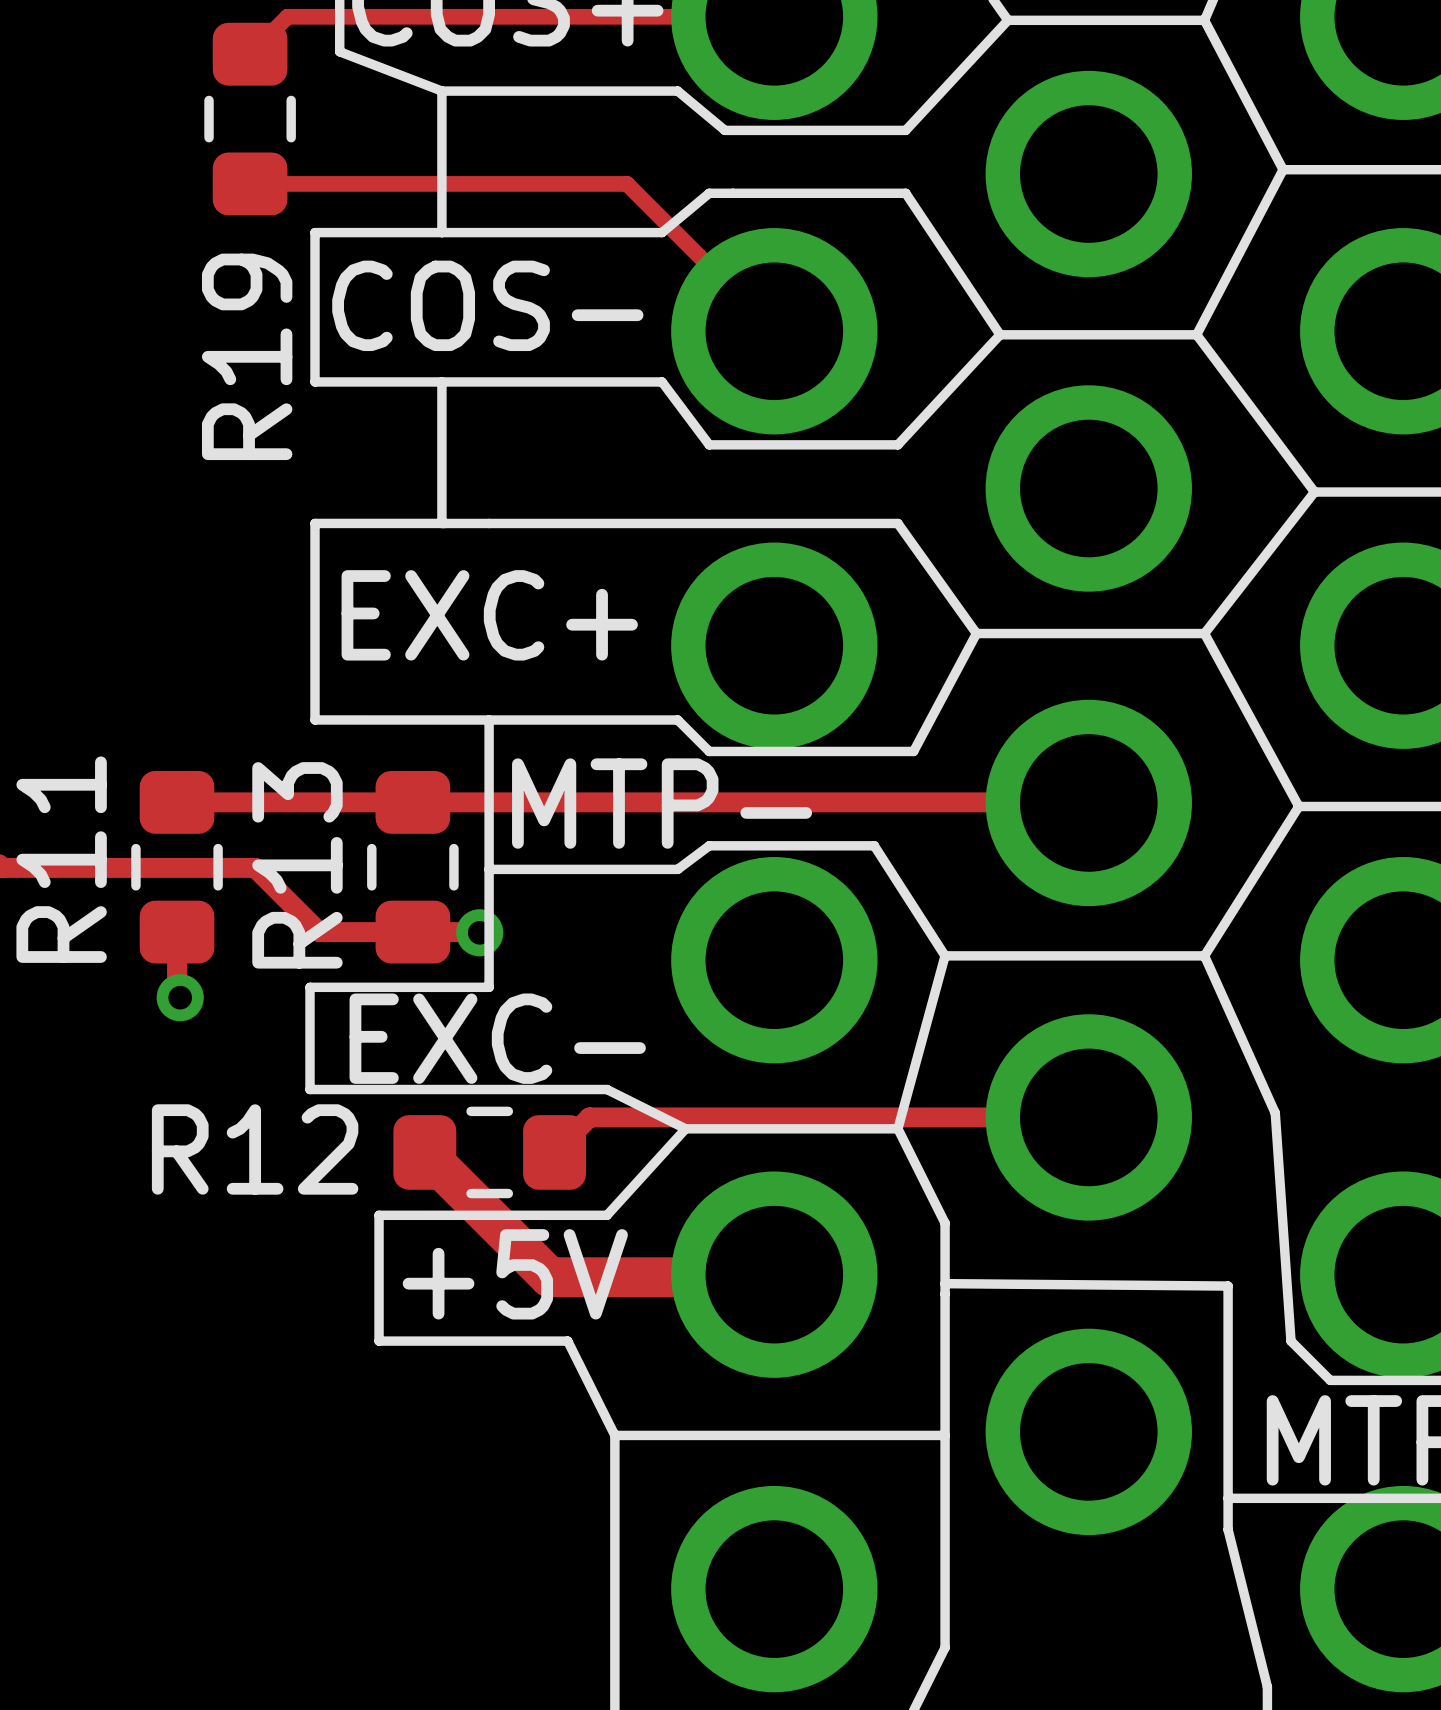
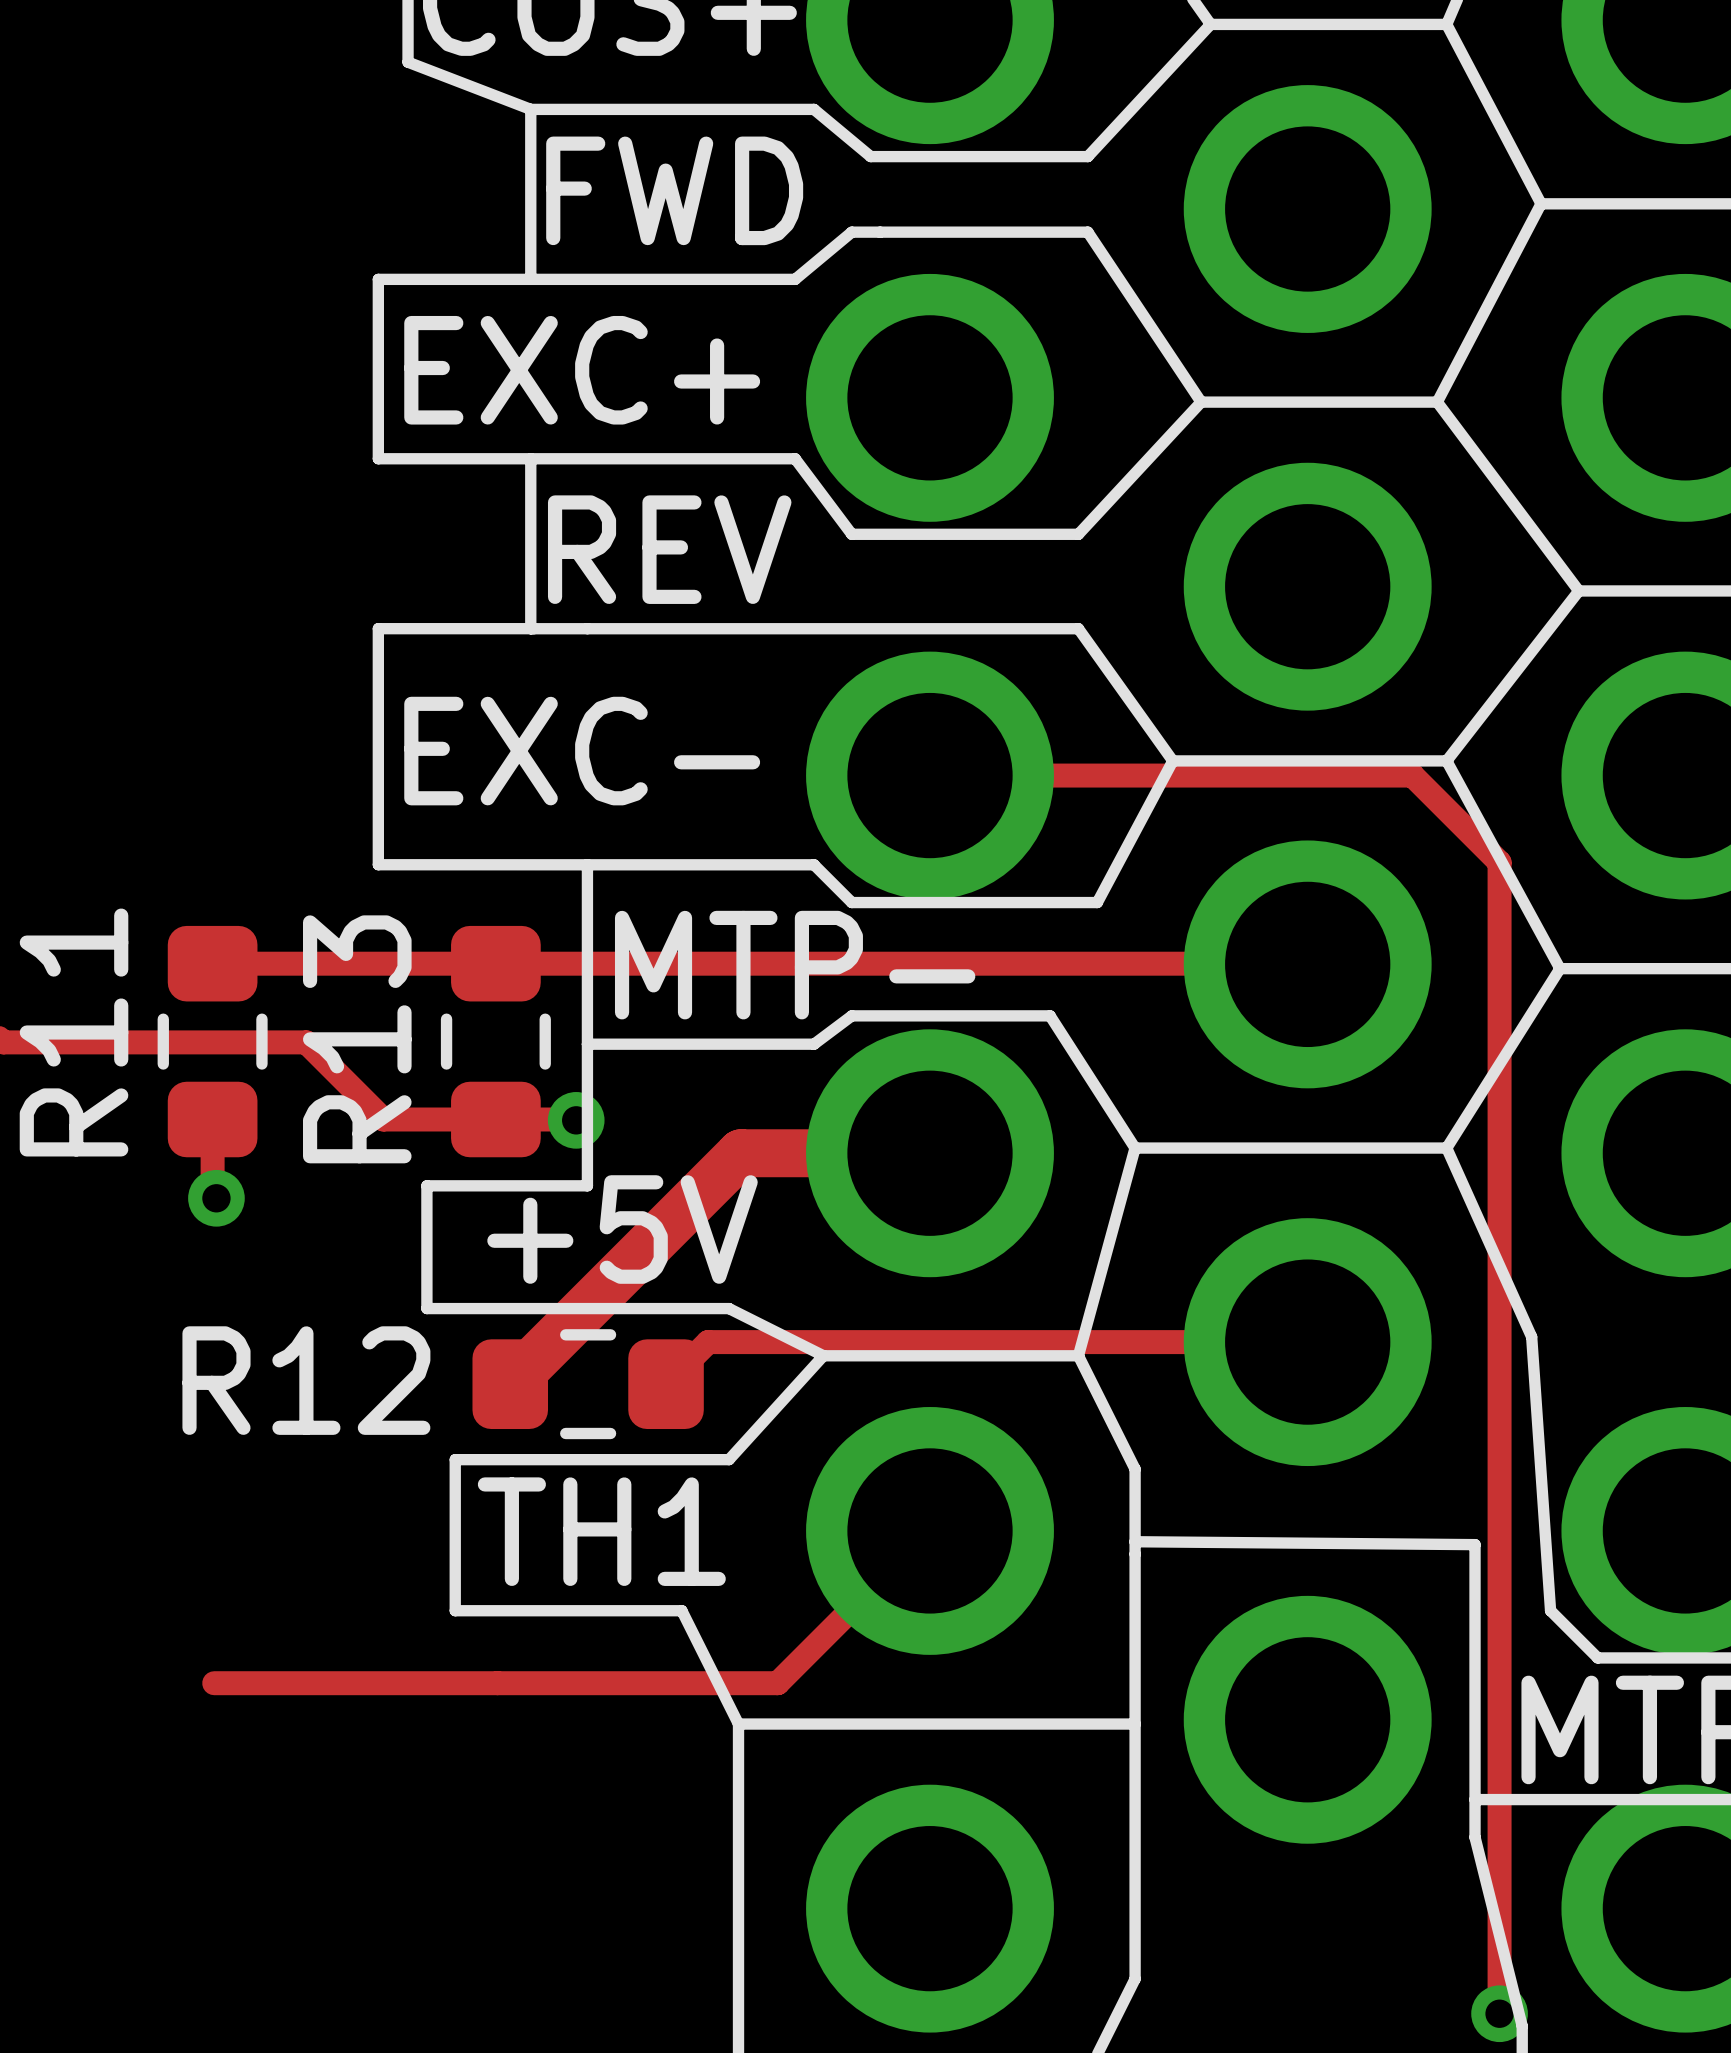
track: (774, 16) (287, 16) (250, 54) -> none
R19: (250, 119) -> none
text: none -> FWD (674, 190)
track: (250, 183) (626, 183) (774, 331) -> none
text: COS- (487, 305) -> EXC+ (582, 370)
text: none -> REV (669, 549)
text: EXC+ (489, 615) -> none
track: none -> (930, 775) (1412, 775) (1499, 862) (1499, 2013)
line: (355, 987) (310, 987) (310, 1089) (355, 1089) -> (426, 1185) (426, 1308)
text: none -> +5V (622, 1229)
text position: EXC- (497, 1038) -> EXC- (582, 751)
track: (424, 1152) (549, 1277) (766, 1277) -> (510, 1384) (741, 1153) (930, 1153)
text: +5V (515, 1274) -> TH1 (601, 1531)
track: none -> (930, 1530) (777, 1683) (214, 1683)
via: none -> (1499, 2013)

